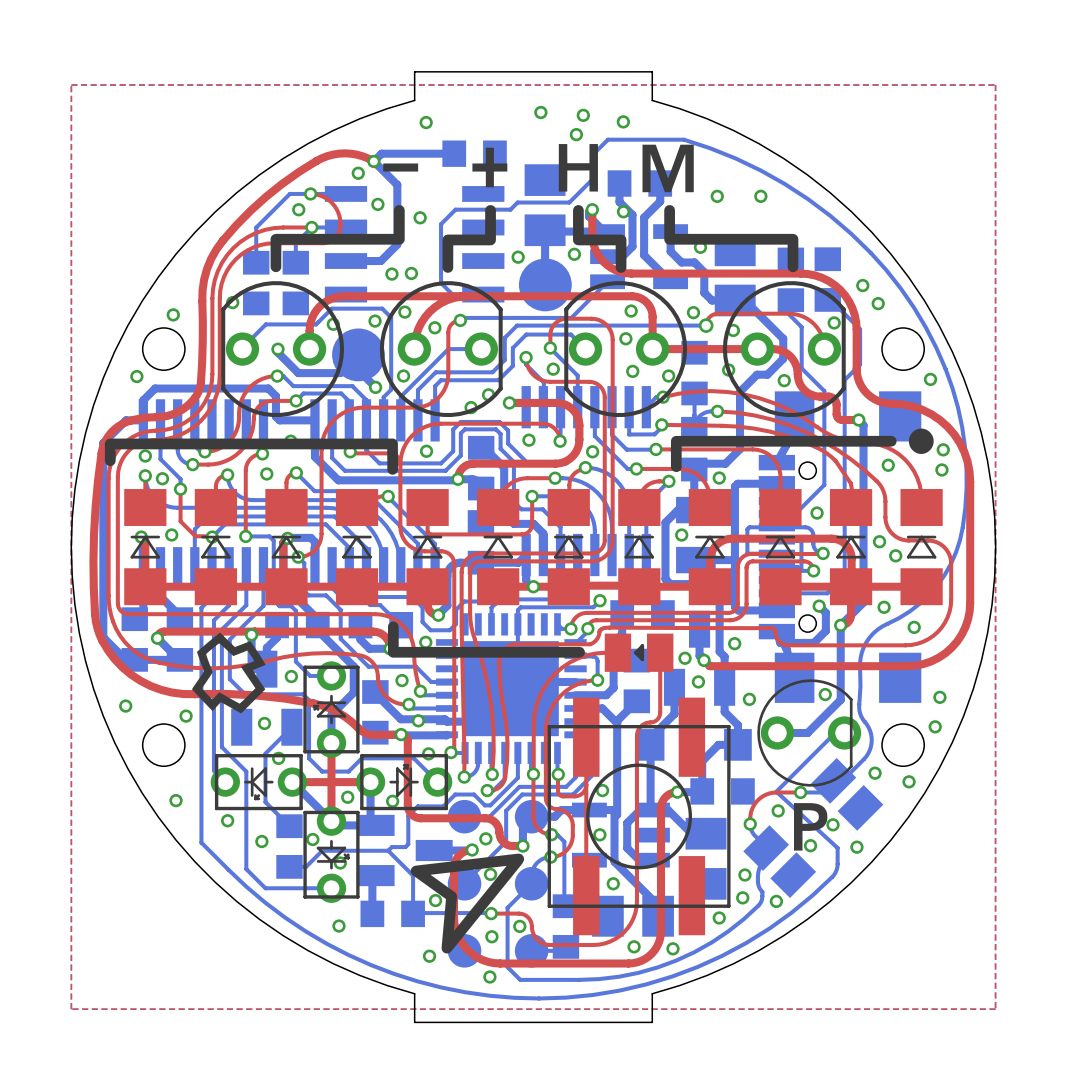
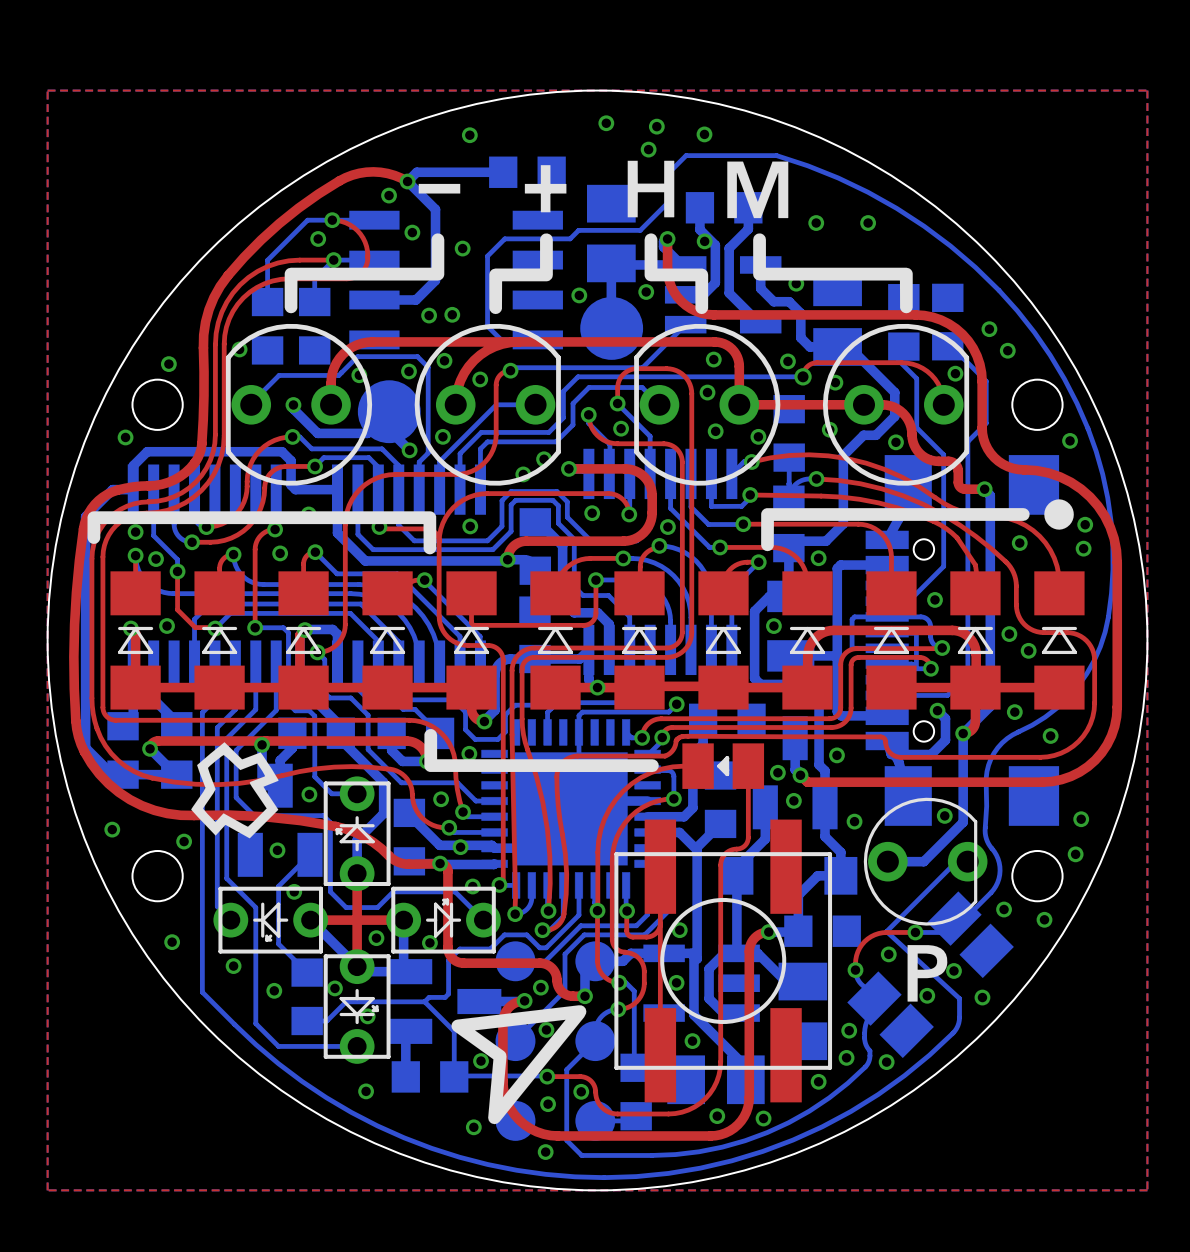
board edge: (414, 71) (652, 71) (652, 100) (706, 118) (758, 143) (783, 158) (830, 192) (871, 232) (908, 277) (939, 325) (963, 378) (981, 432) (987, 461) (994, 518) (994, 575) (992, 604) (987, 633) (973, 689) (952, 742) (939, 768) (924, 793) (890, 840) (851, 882) (830, 901) (783, 935) (733, 963) (706, 975) (652, 993) (652, 1022) (414, 1022) (414, 993) (359, 975) (307, 950) (283, 935) (236, 901) (194, 861) (158, 817) (127, 768) (103, 716) (85, 661) (79, 633) (72, 575) (72, 518) (74, 489) (79, 461) (93, 405) (114, 351) (127, 325) (142, 300) (176, 254) (215, 211) (236, 192) (283, 158) (333, 130) (359, 118) (414, 100) (414, 71) -> none
round board edge: none -> [47, 90, 1148, 1191]

